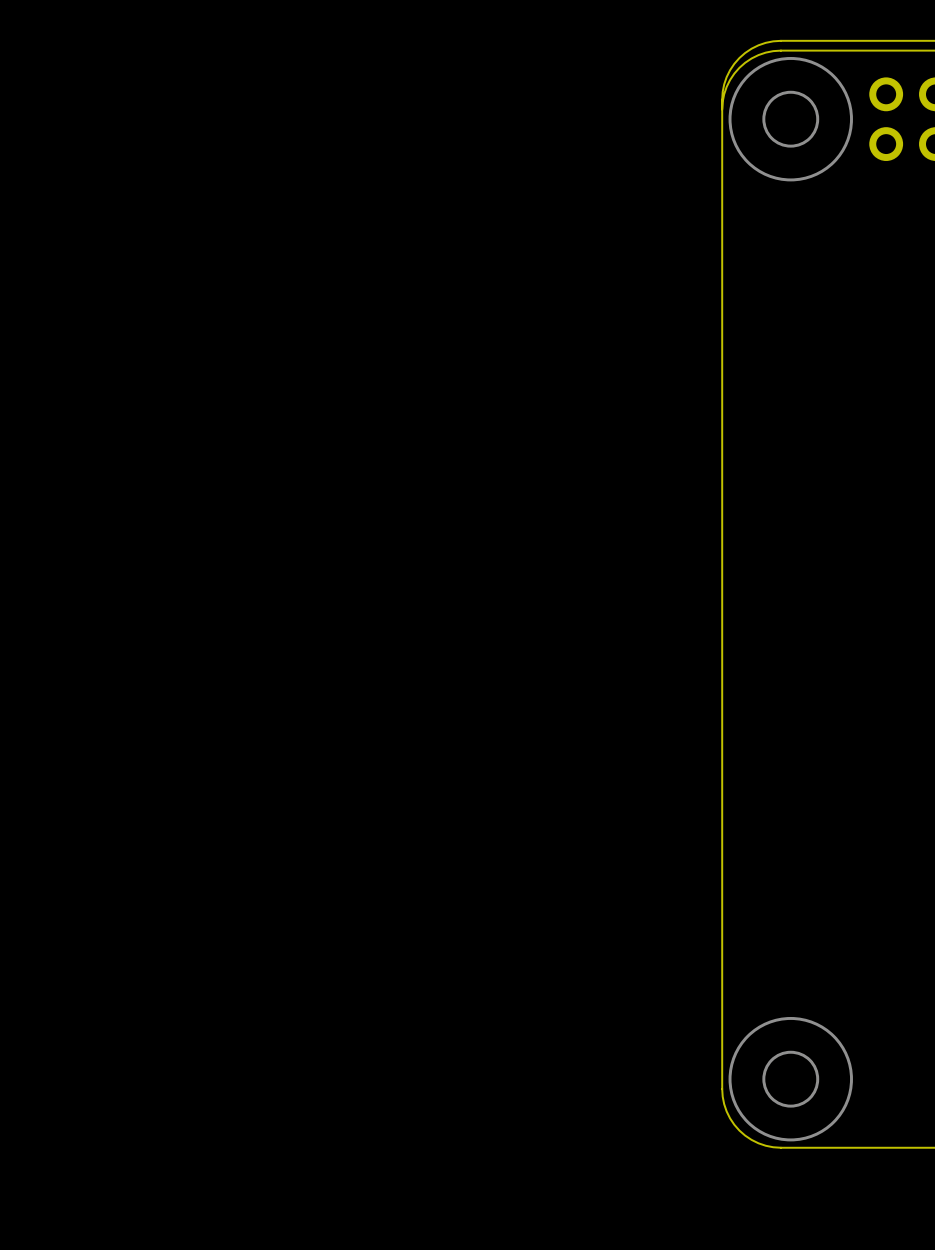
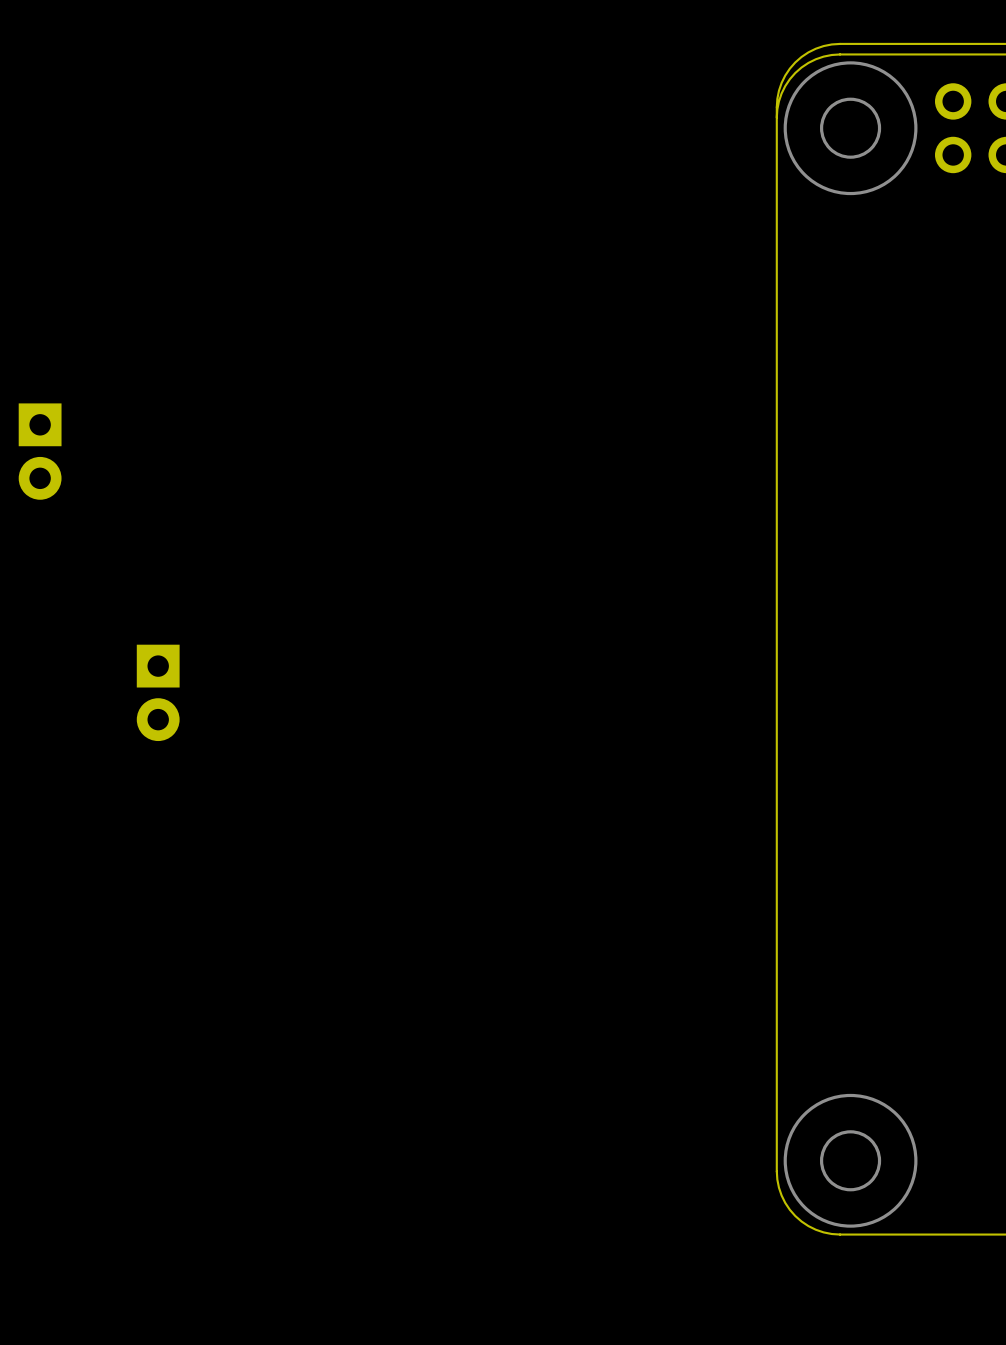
part: none -> (40, 451)
part: none -> (158, 692)

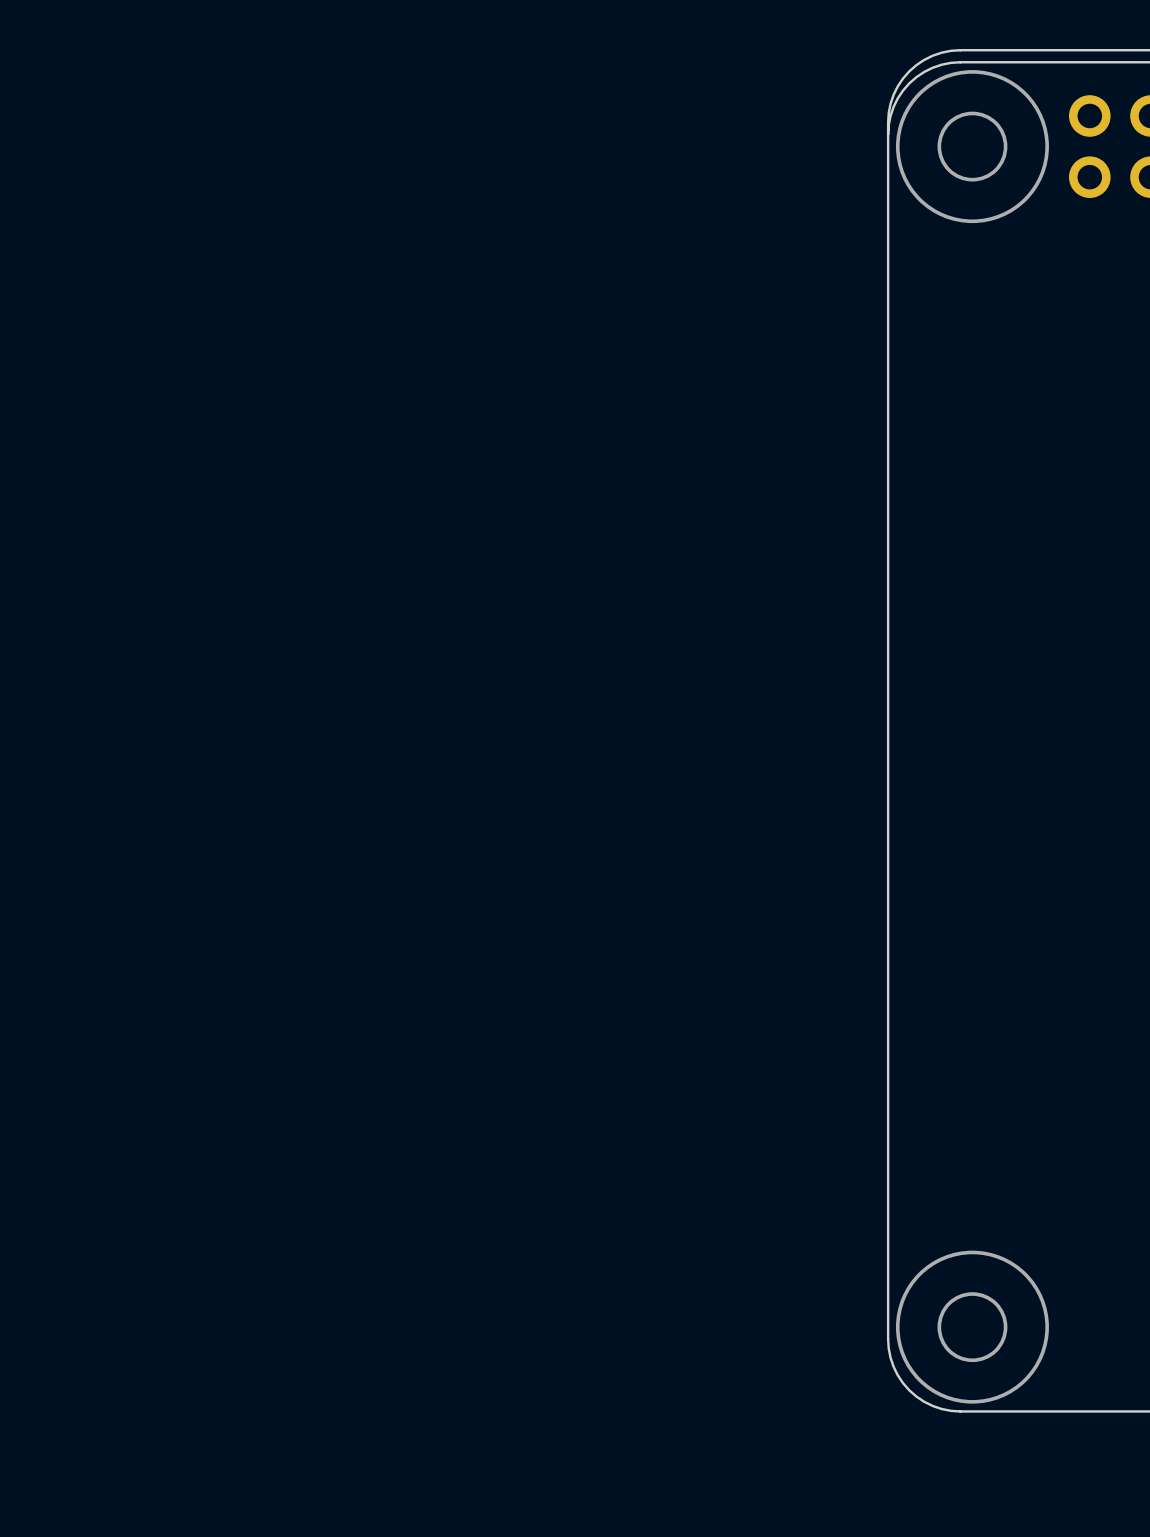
part: (40, 451) -> none
part: (158, 692) -> none

